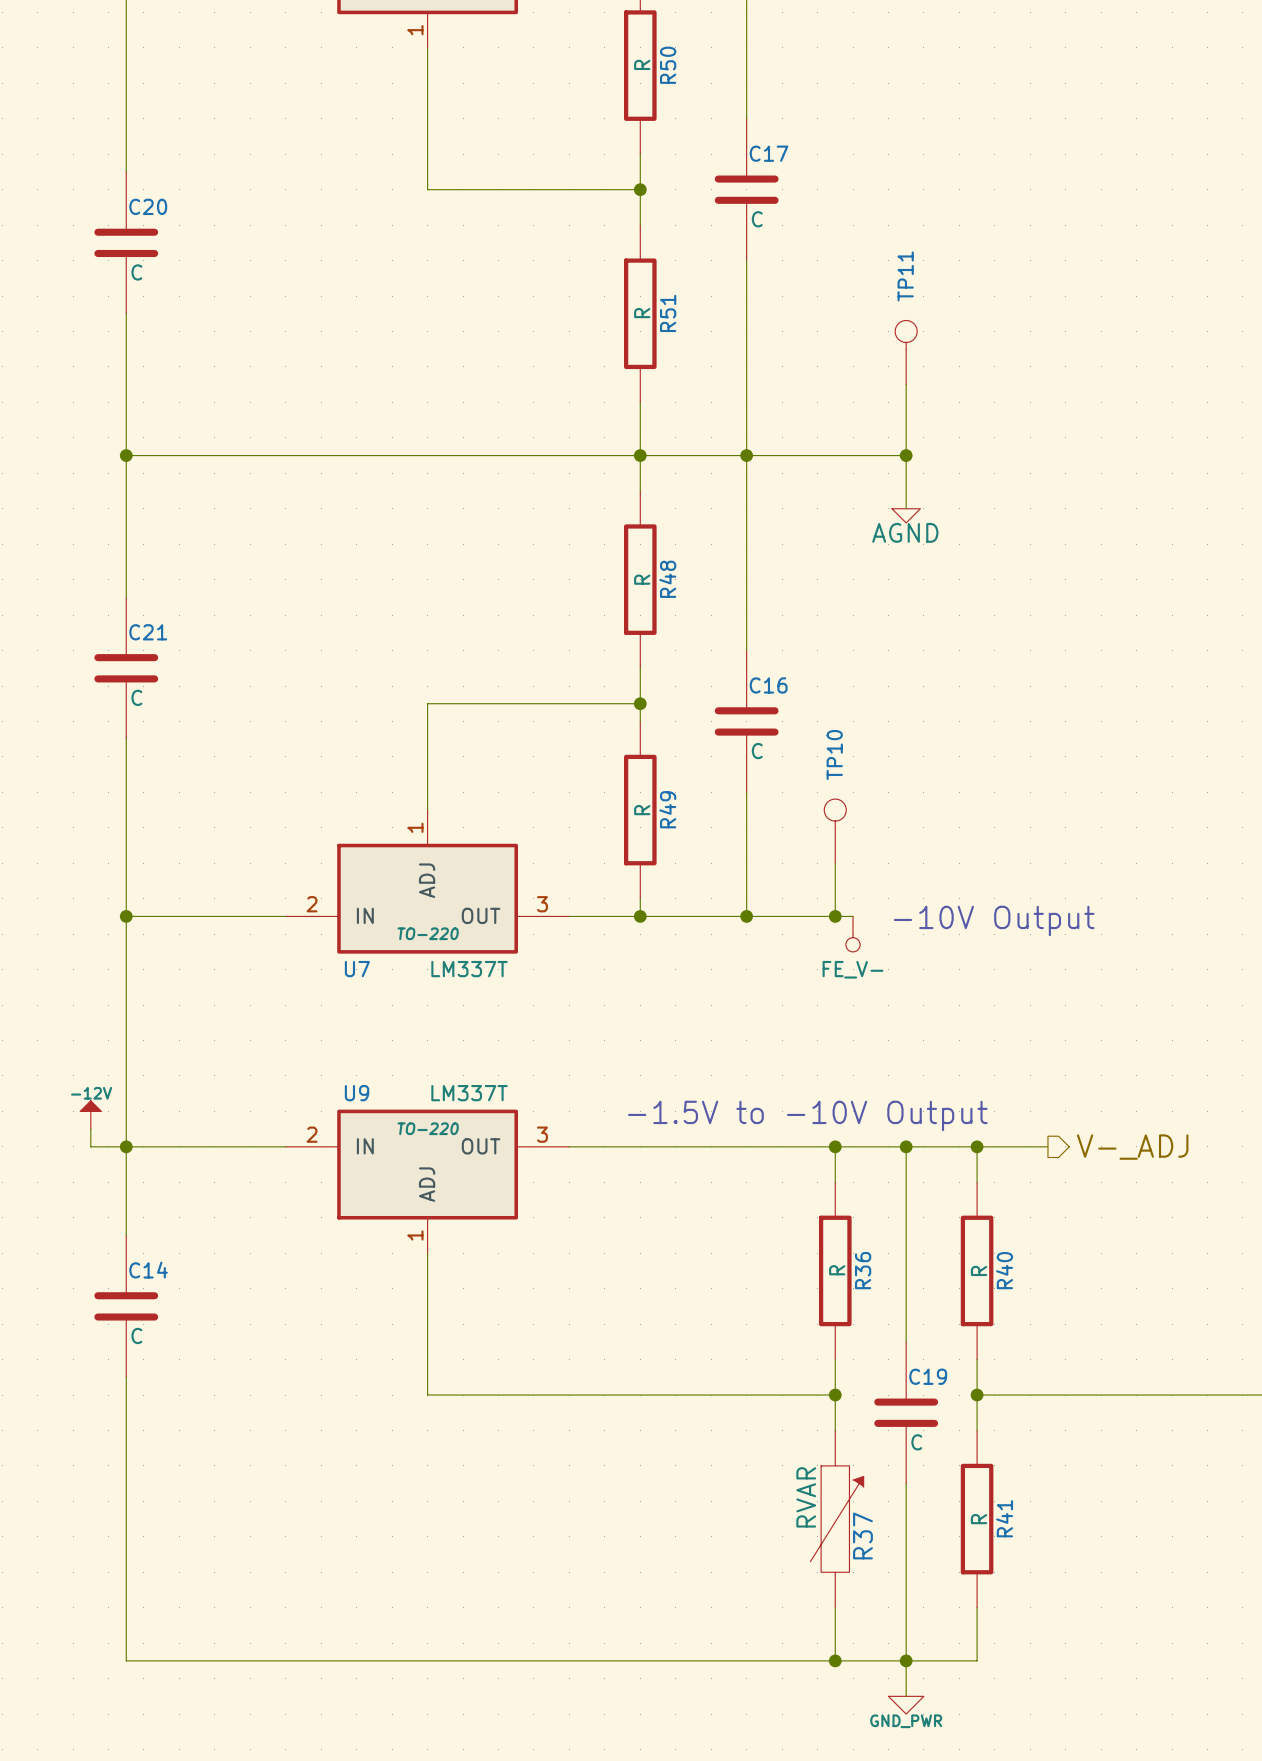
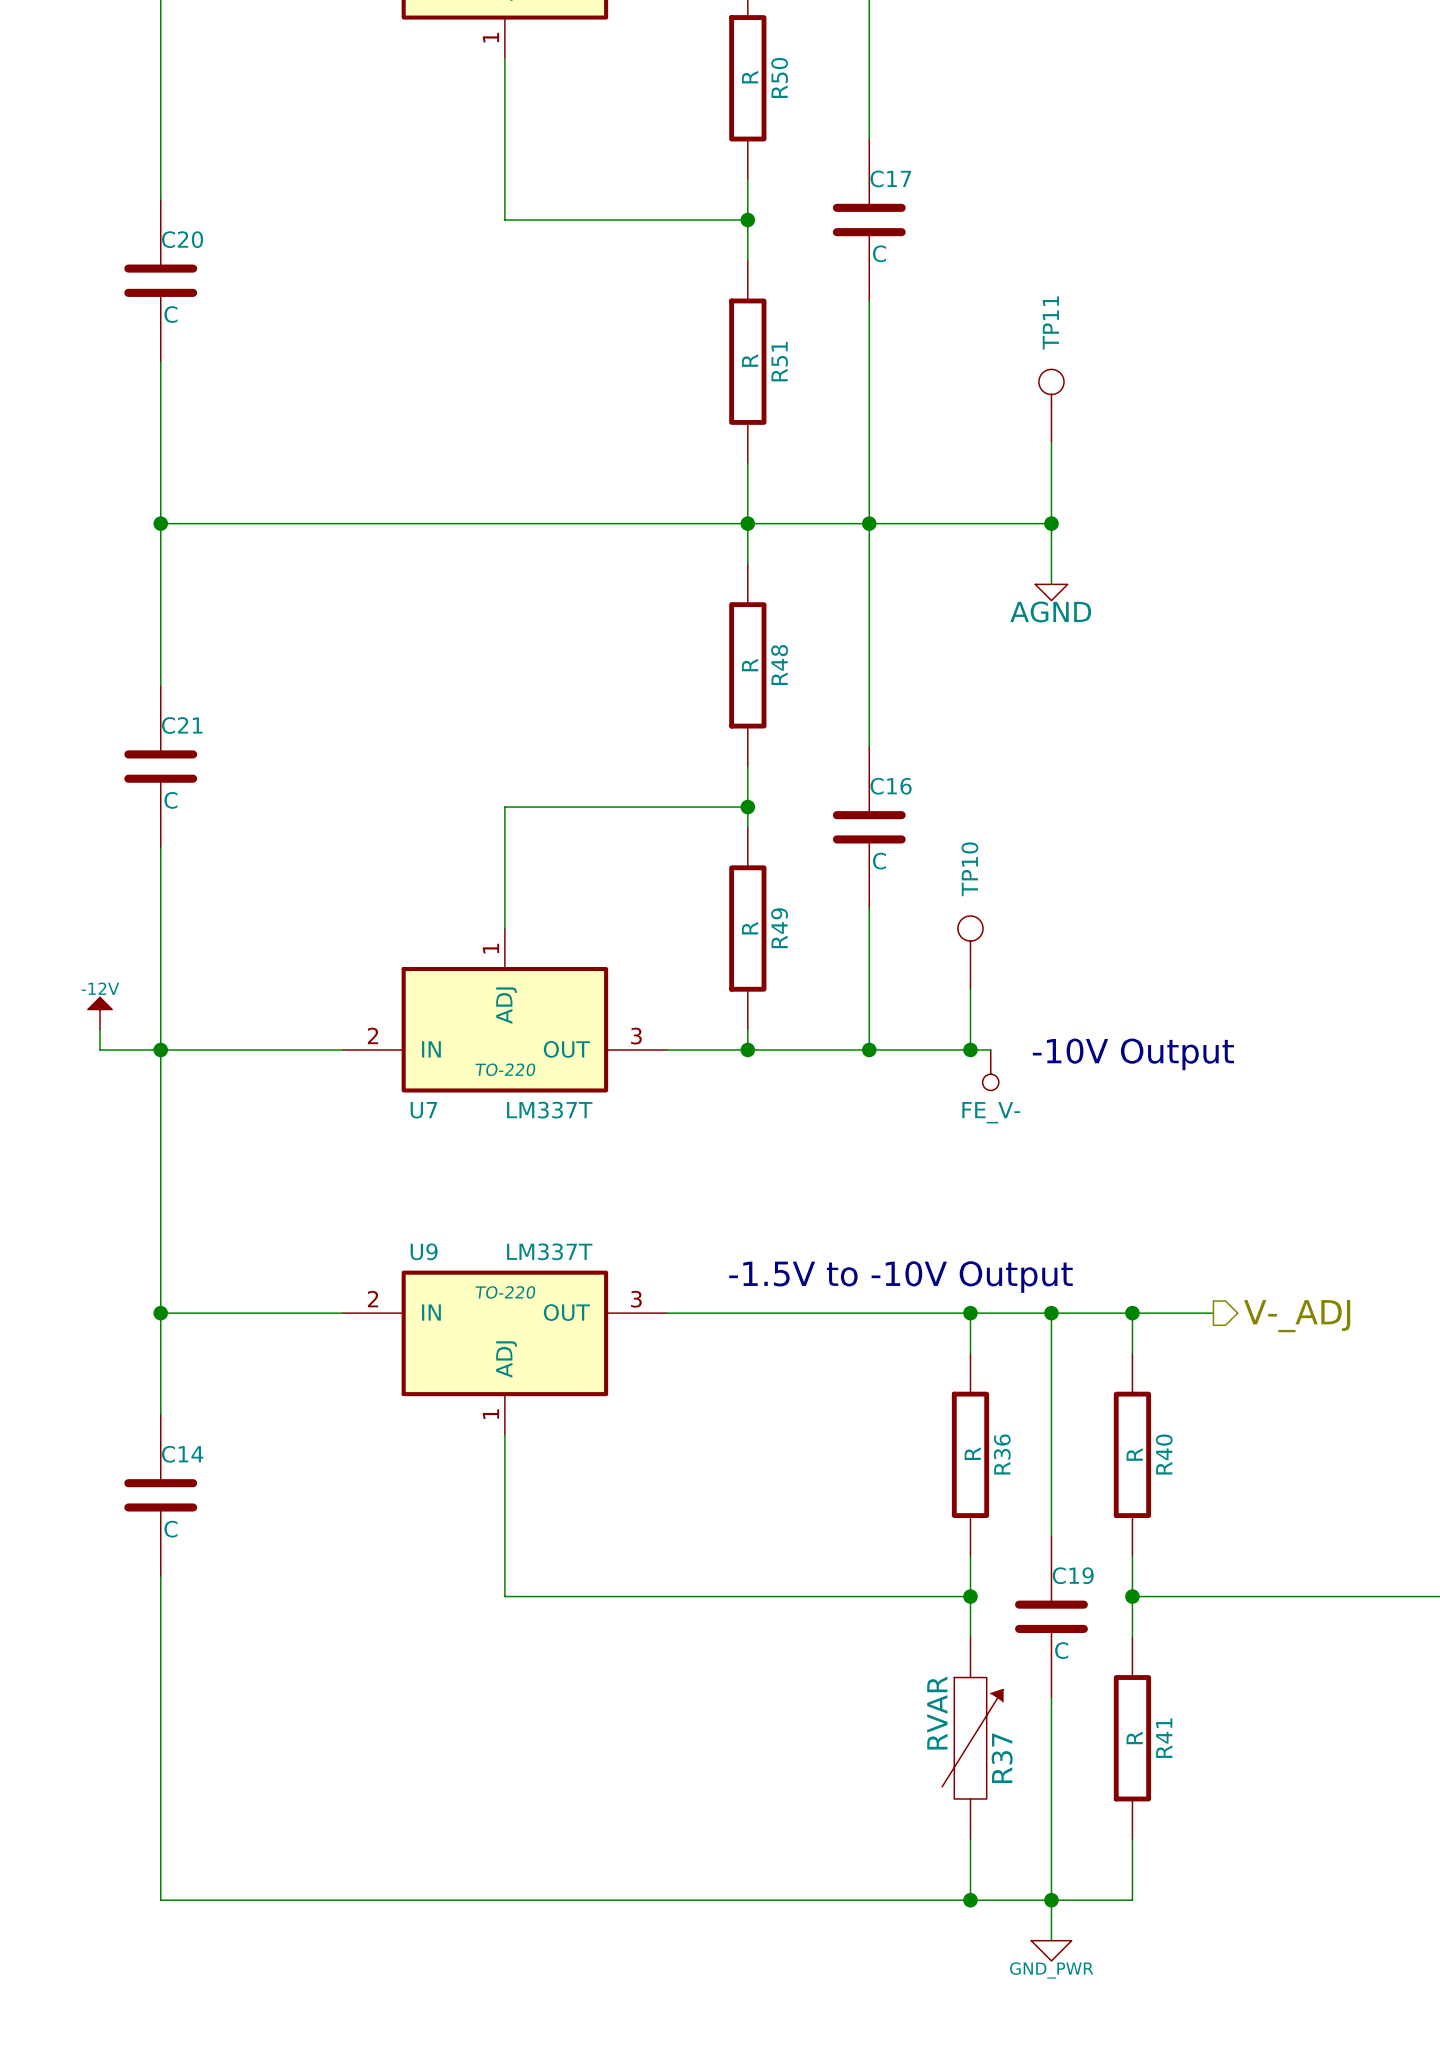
wire: none -> (100, 1029) (100, 1049) (160, 1049)
power symbol position: -12V (90, 1114) -> -12V (100, 1013)
wire: (90, 1129) (90, 1146) (126, 1146) -> none

